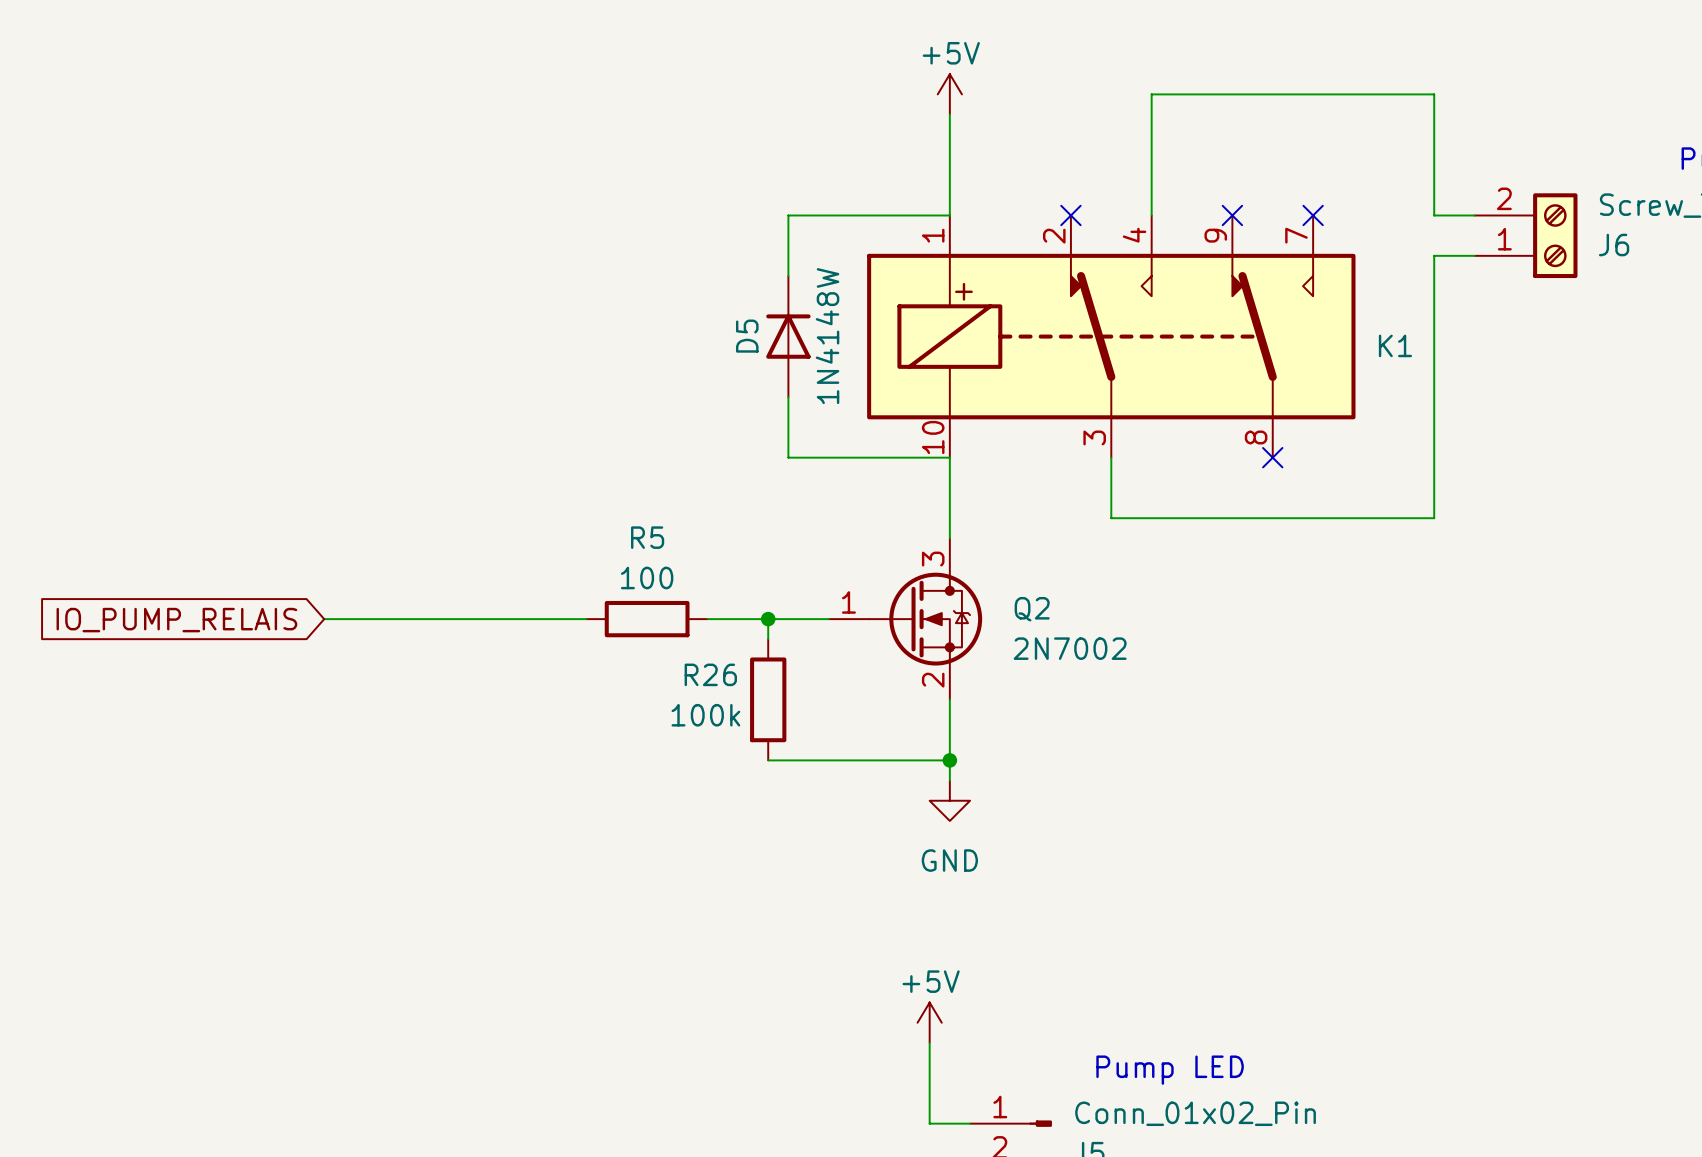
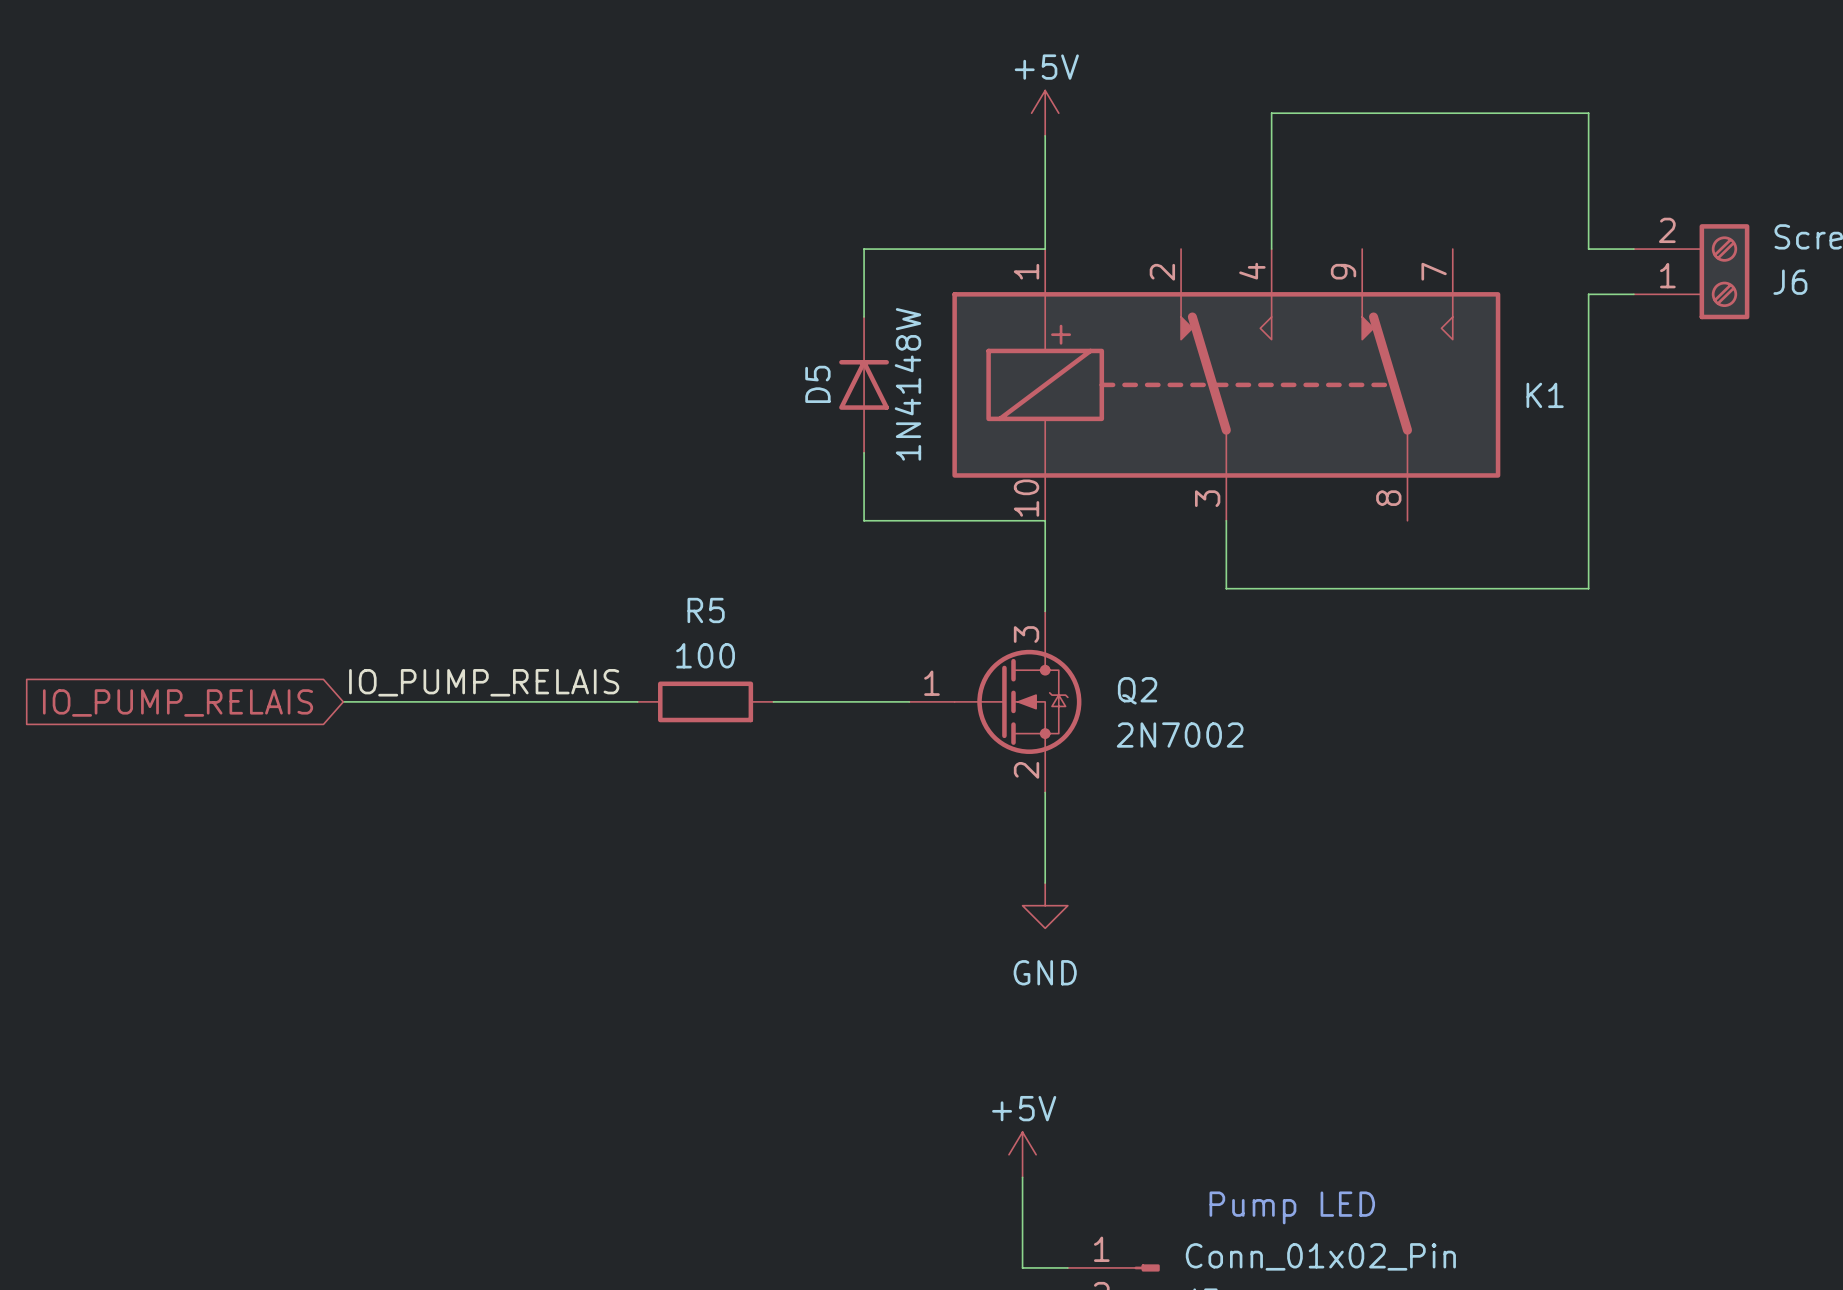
no-connect mark: (1070, 215) -> none
no-connect mark: (1232, 215) -> none
no-connect mark: (1313, 215) -> none
no-connect mark: (1272, 457) -> none
label: none -> IO_PUMP_RELAIS (484, 682)
wire: (768, 619) (768, 639) -> none
junction: (768, 619) -> none
R26: 100k (768, 699) -> none
wire: (768, 760) (949, 760) -> none
junction: (949, 760) -> none

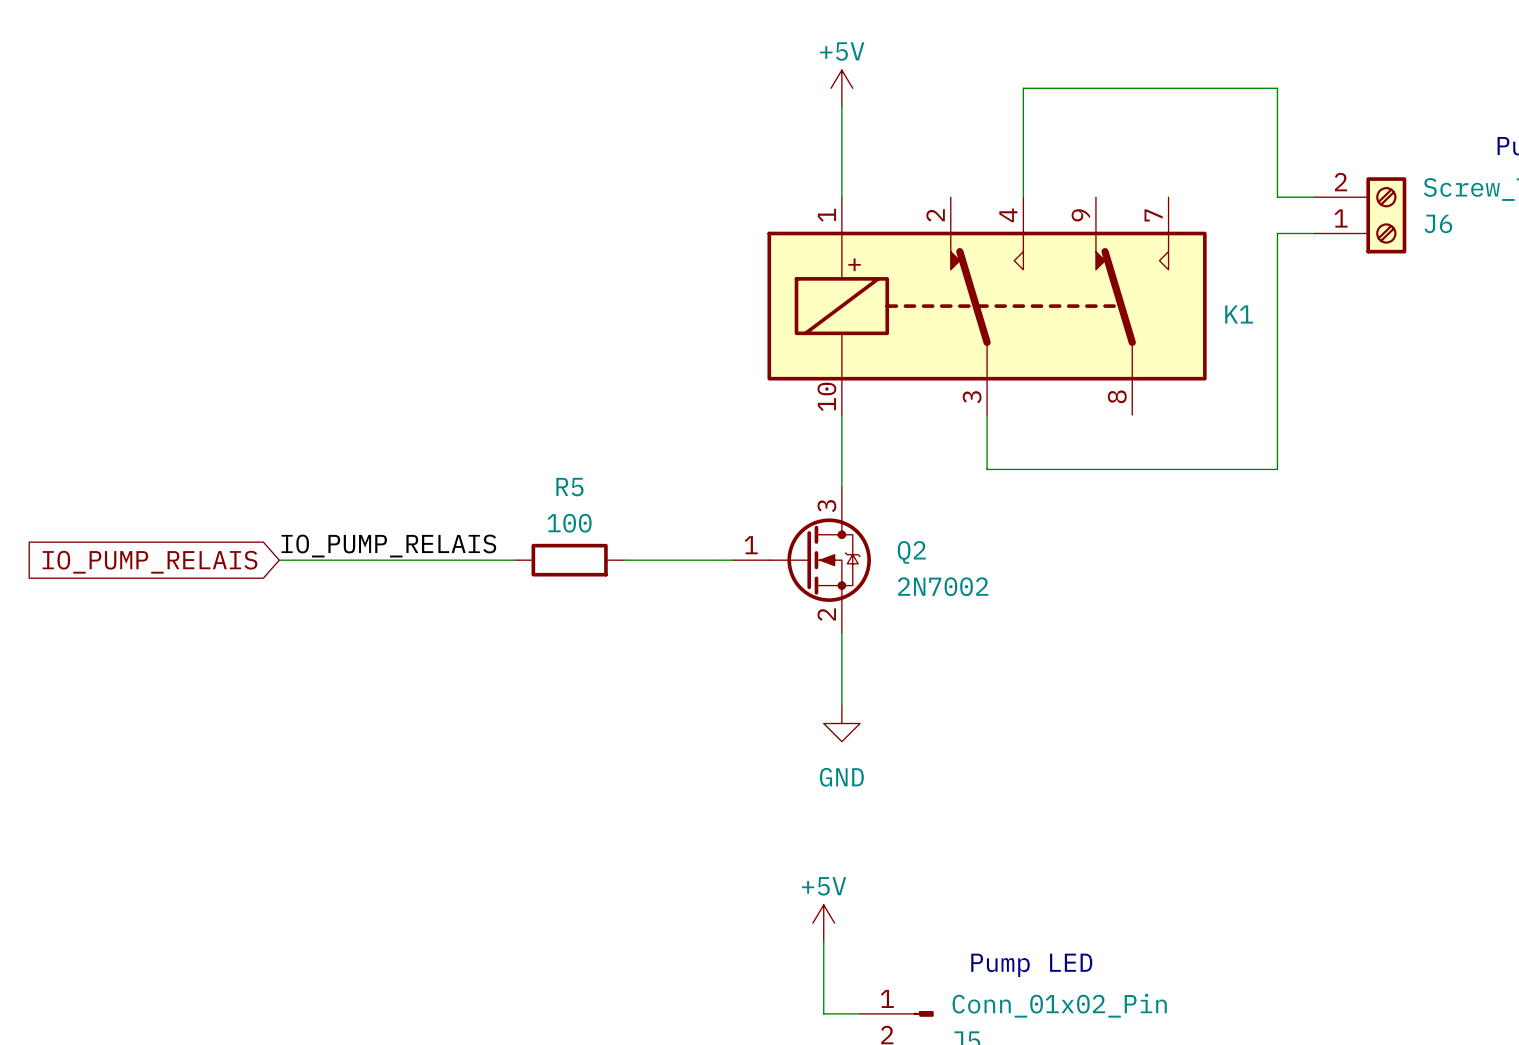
wire: (1045, 249) (864, 249) (864, 316) -> none
D5: 1N4148W (864, 384) -> none
wire: (864, 452) (864, 520) (1045, 520) -> none

